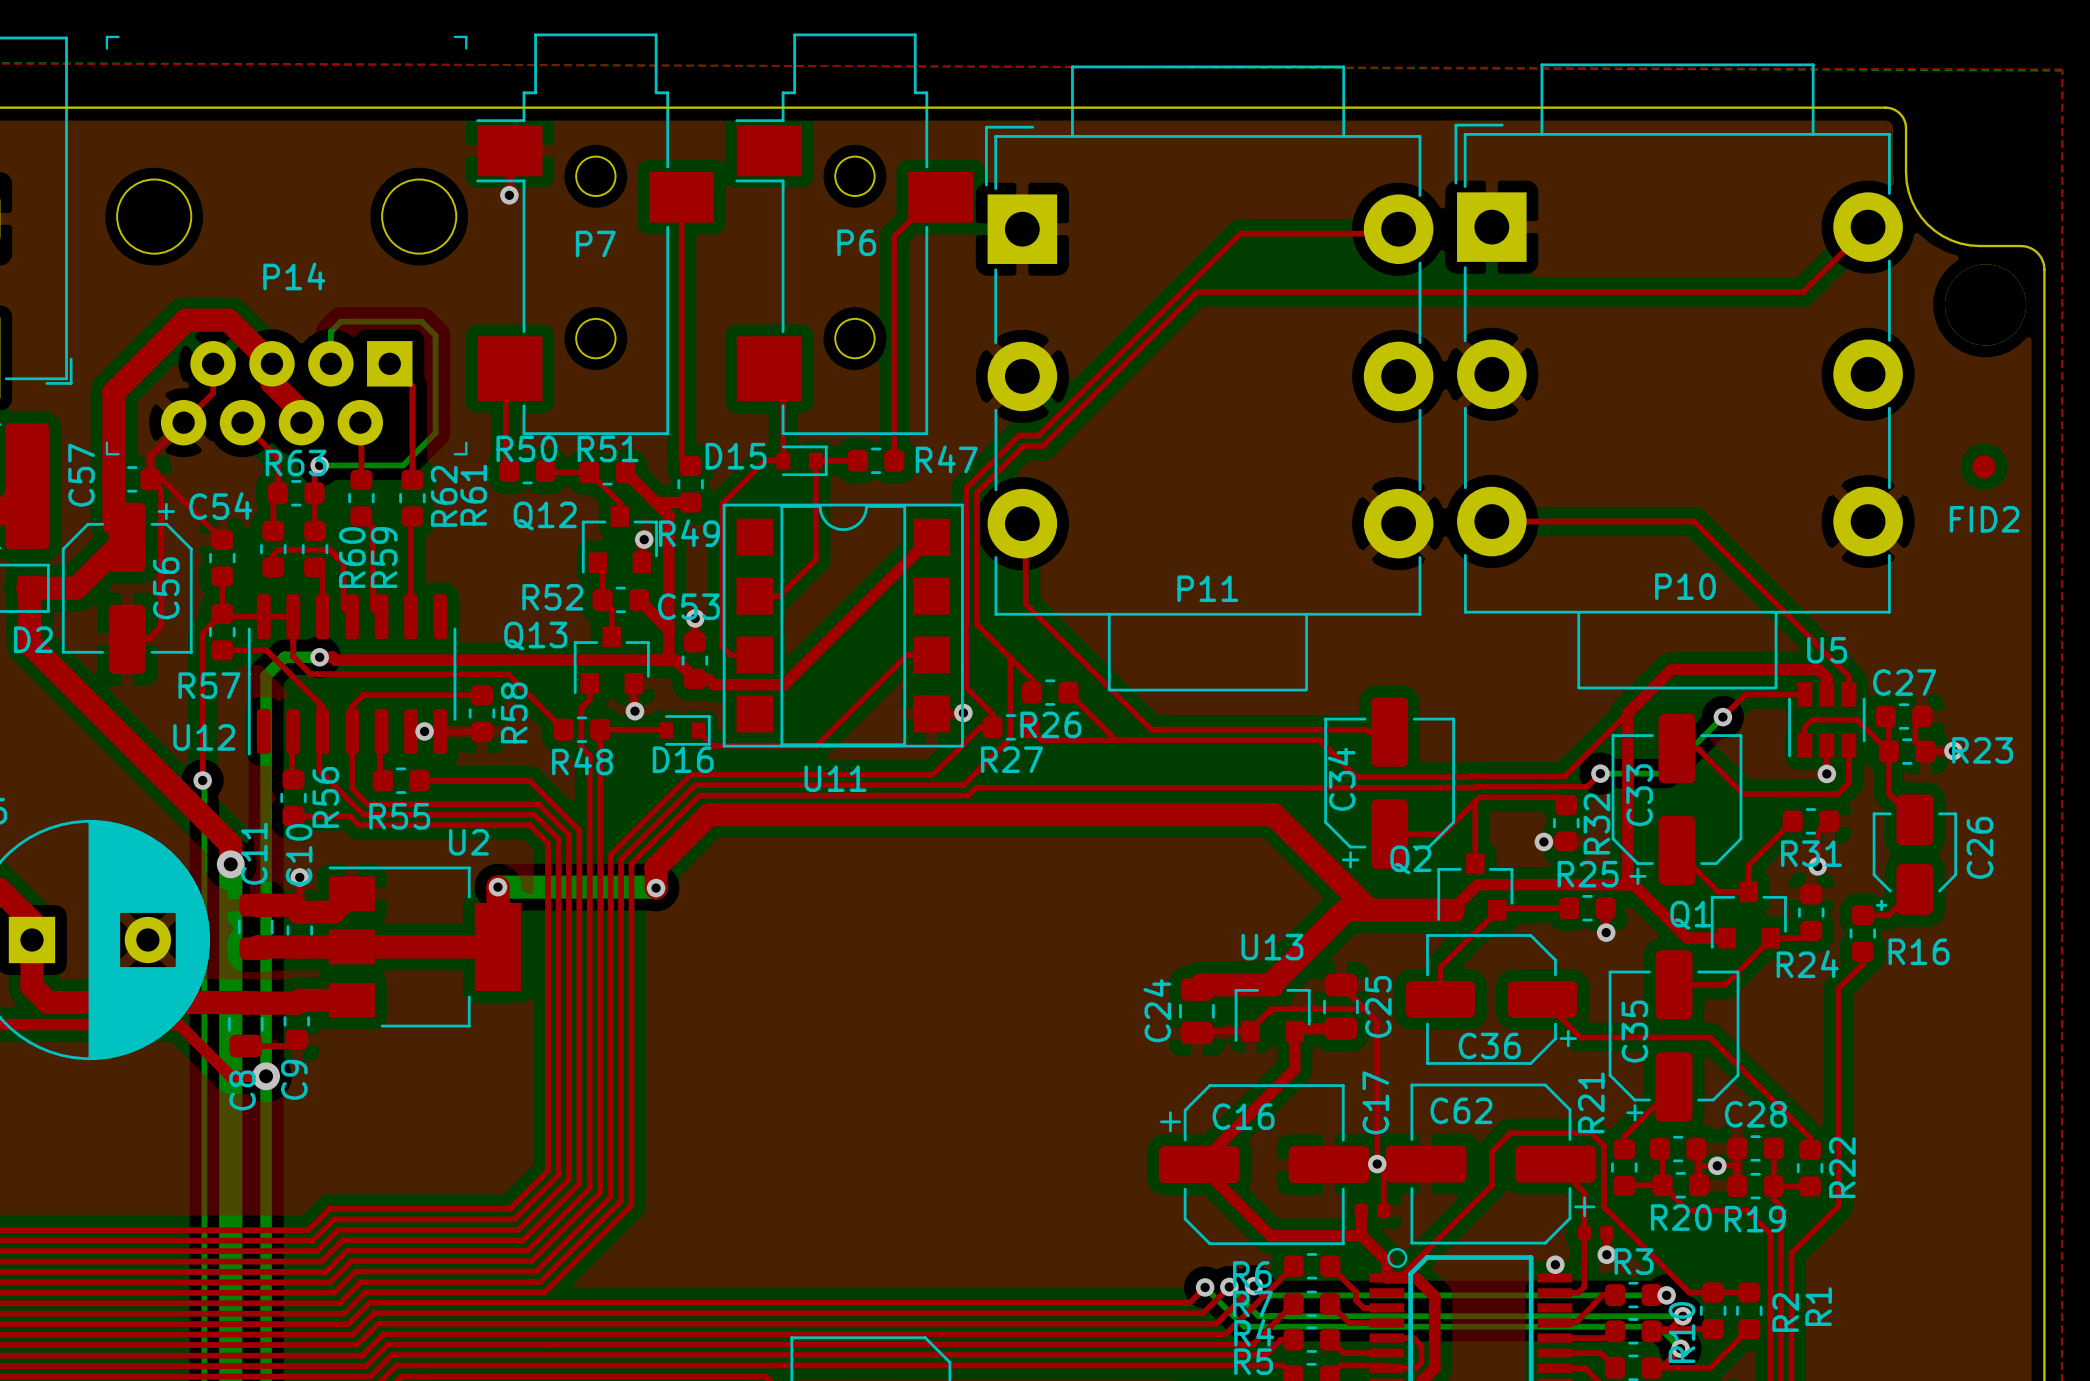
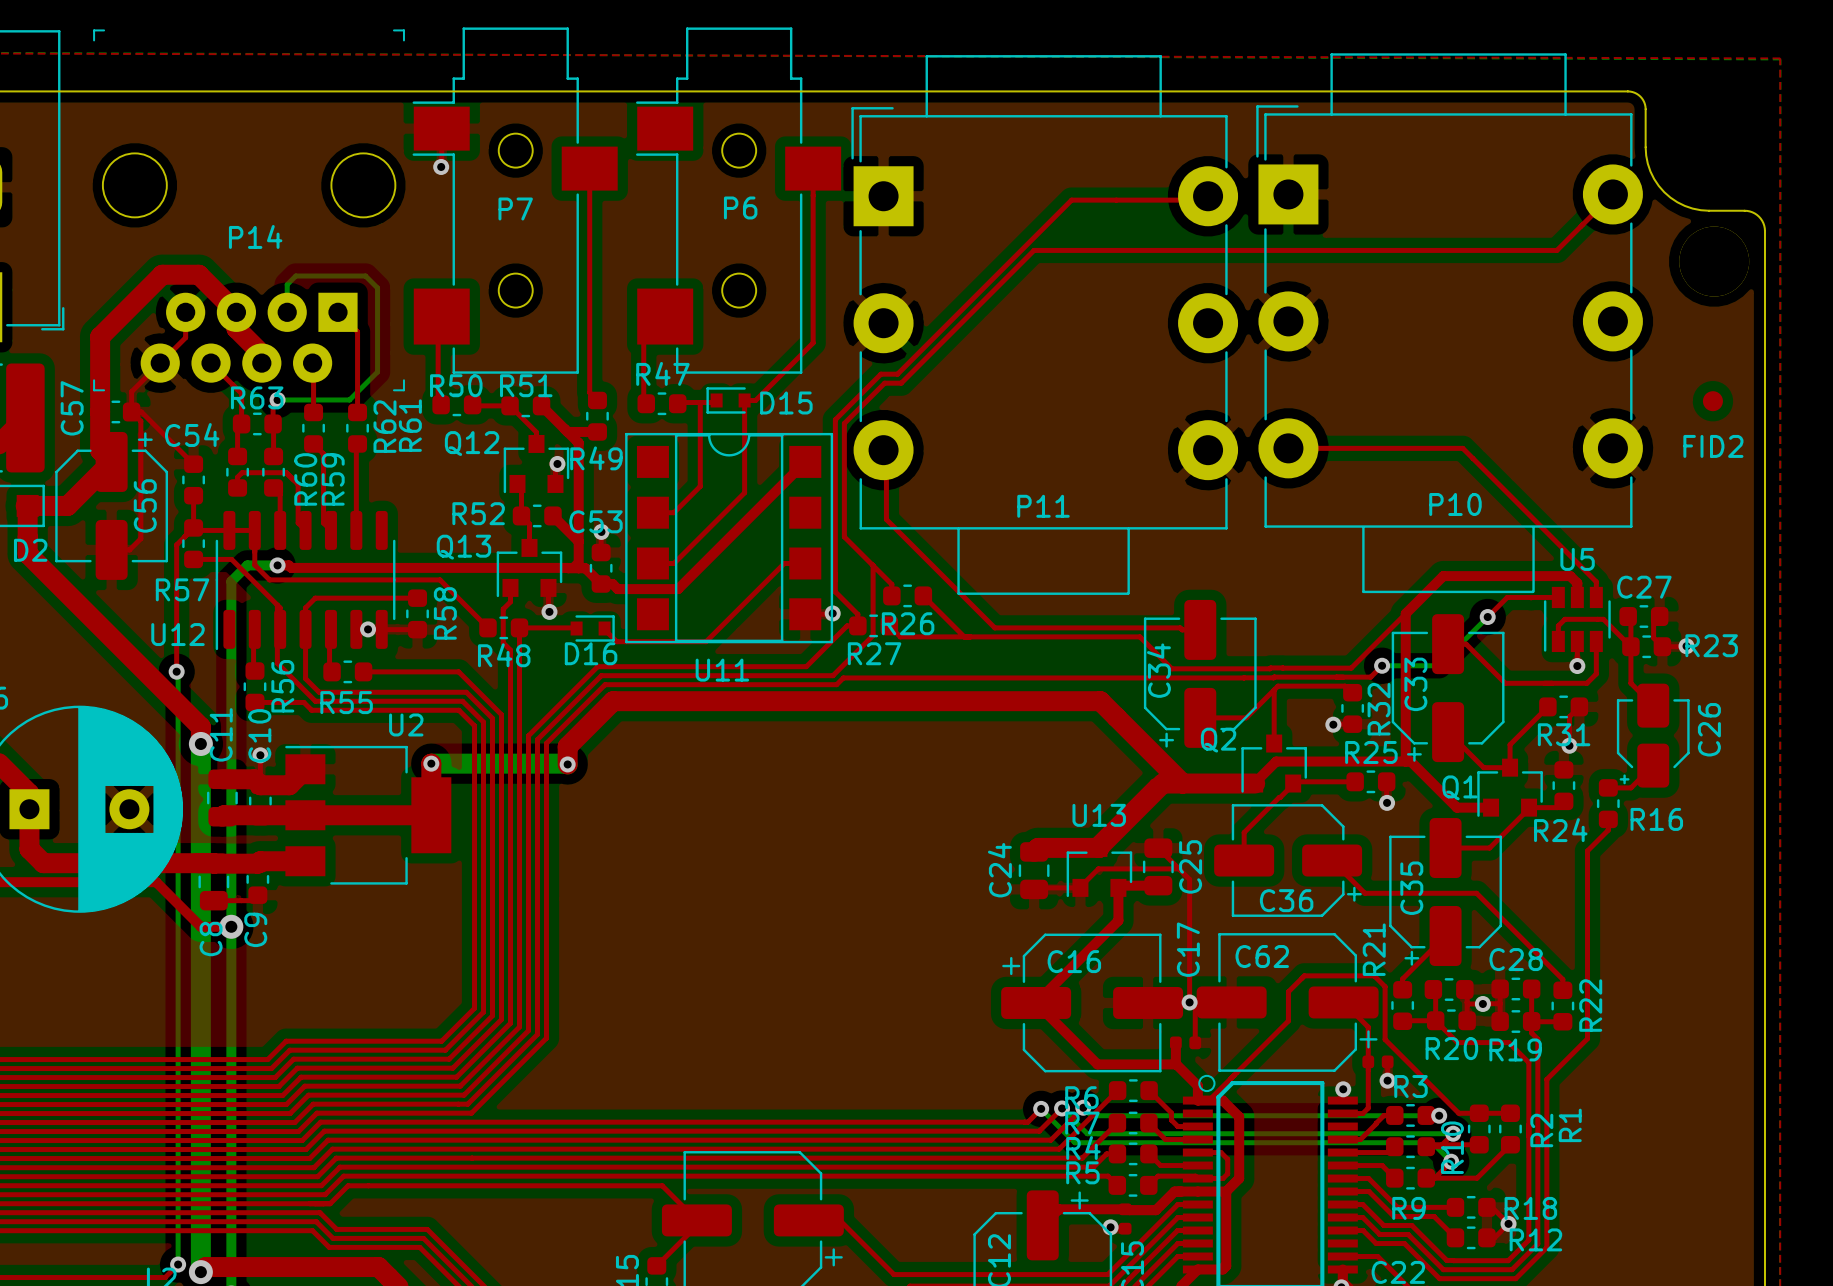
top track: (940, 197) (933, 197) (894, 236) (894, 460) -> (813, 168) (813, 342) (755, 400) (744, 400) (744, 492) (673, 563) (652, 563)
top track: (769, 368) (783, 382) (783, 460) (765, 460) (722, 503) (722, 646) (730, 655) (754, 655) -> (665, 316) (643, 338) (643, 402)
R47 name position: R47 (946, 459) -> R47 (662, 373)
D15 rotation: 0° (802, 460) -> 180° (728, 400)
D15 position: (802, 460) -> (728, 400)
top track: (857, 460) (815, 460) (815, 559) (809, 565) -> (700, 402) (700, 486)
R47 position: (876, 460) -> (661, 403)
top track: none -> (716, 400) (714, 402) (681, 402)

